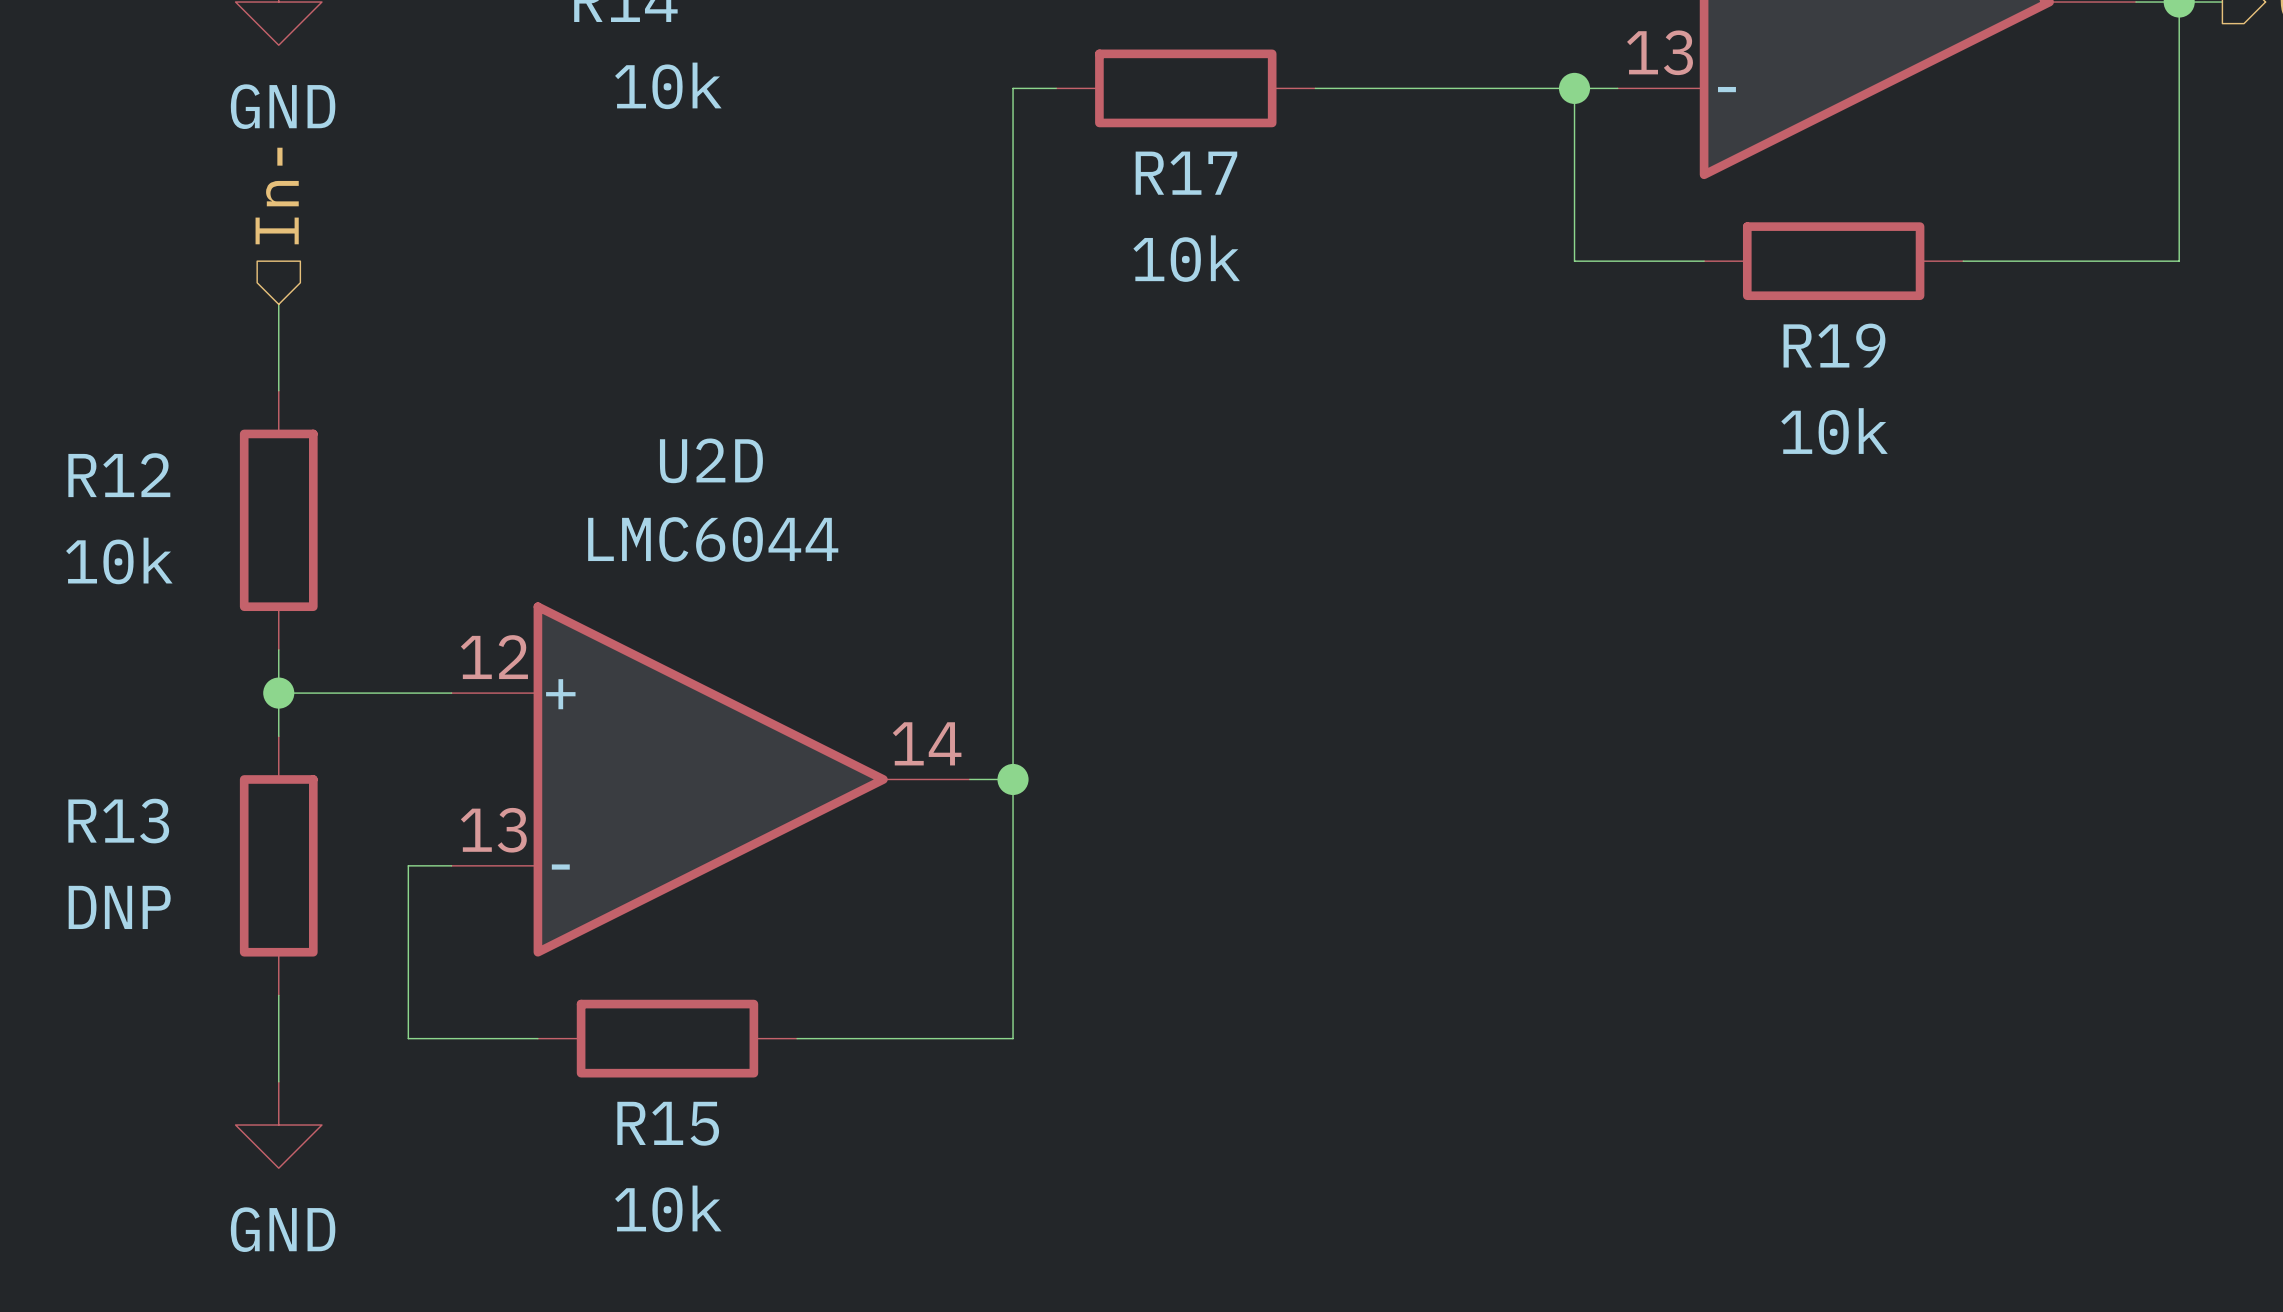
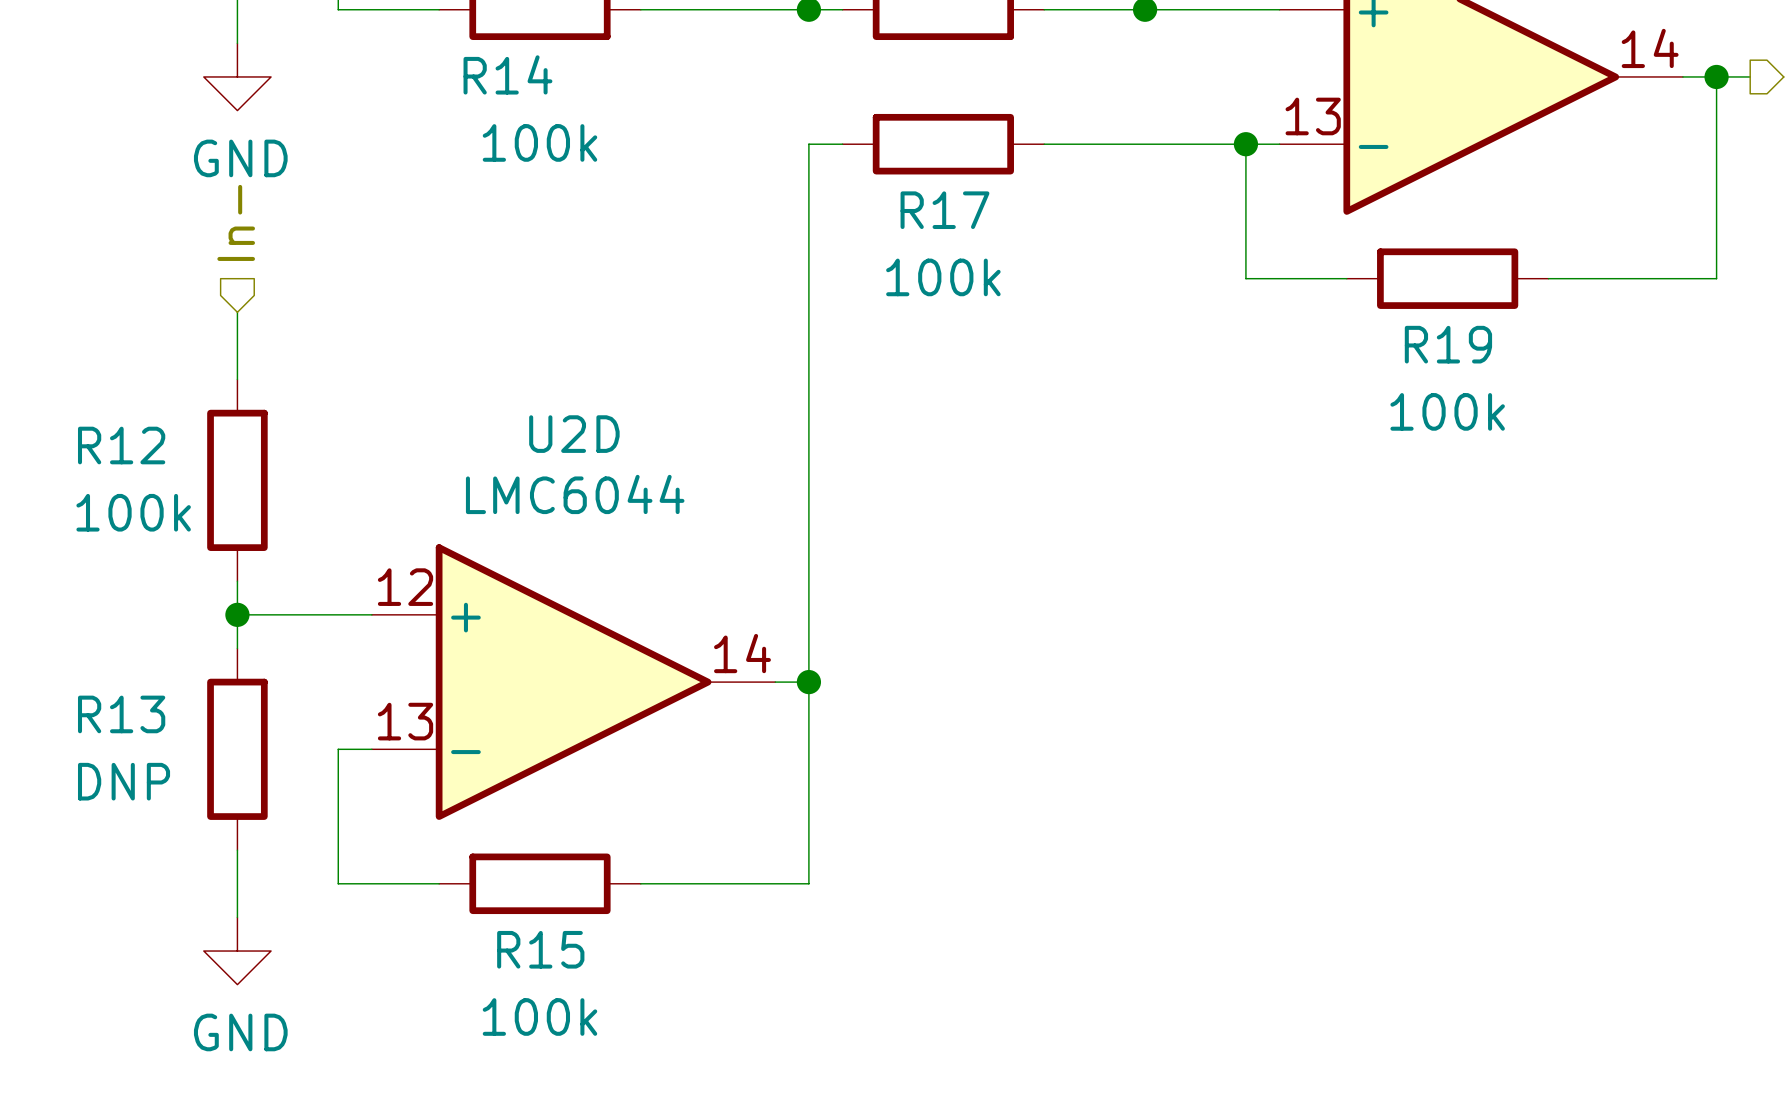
R14 value: 10k (668, 85) -> 100k (539, 142)
R17 value: 10k (1186, 258) -> 100k (943, 277)
R19 value: 10k (1834, 431) -> 100k (1447, 411)
R12 value: 10k (119, 560) -> 100k (133, 512)
R15 value: 10k (668, 1208) -> 100k (539, 1017)

